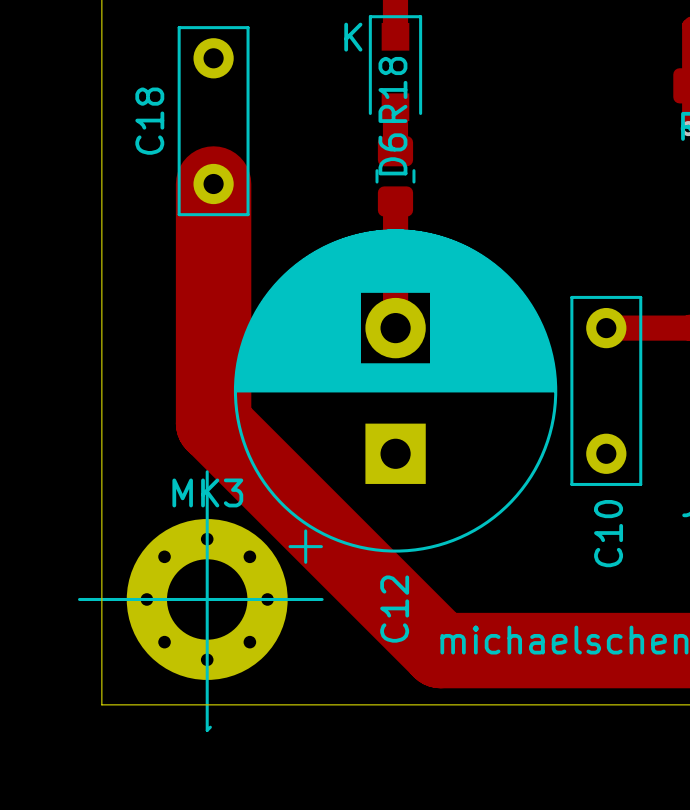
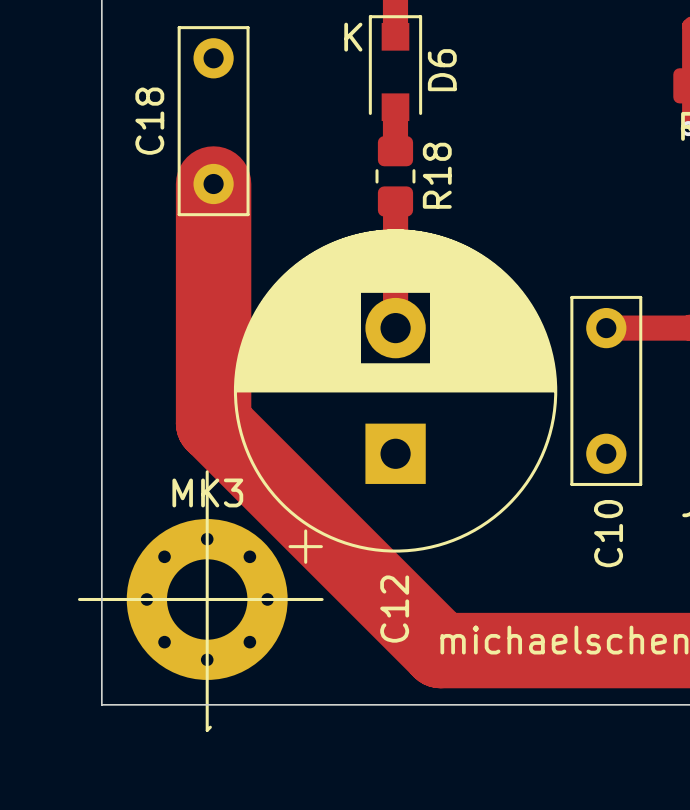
R18 name position: R18 (392, 89) -> R18 (437, 175)
D6 name position: D6 (392, 154) -> D6 (442, 70)

